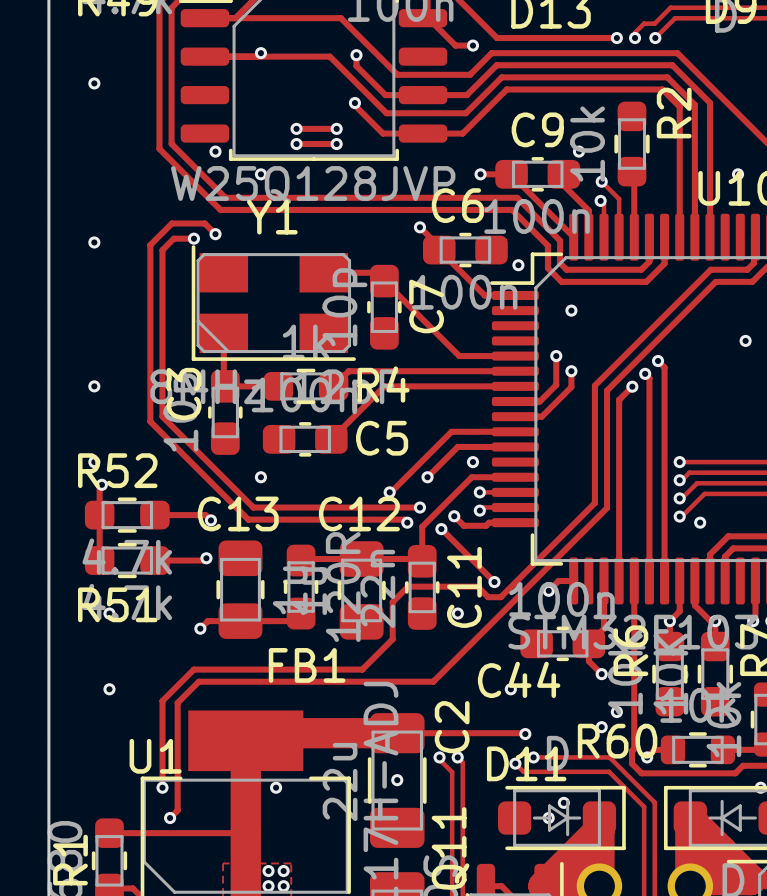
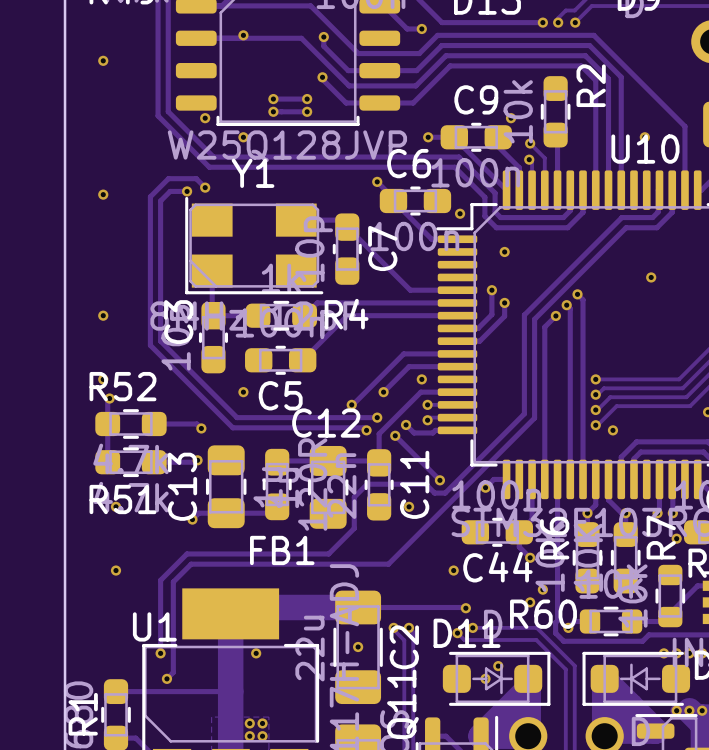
C5 name position: C5 (382, 438) -> C5 (280, 395)
C13 name rotation: 0° (238, 513) -> 90° counterclockwise (182, 486)
C44 name position: C44 (519, 679) -> C44 (497, 567)
C2 name position: C2 (452, 727) -> C2 (404, 647)

